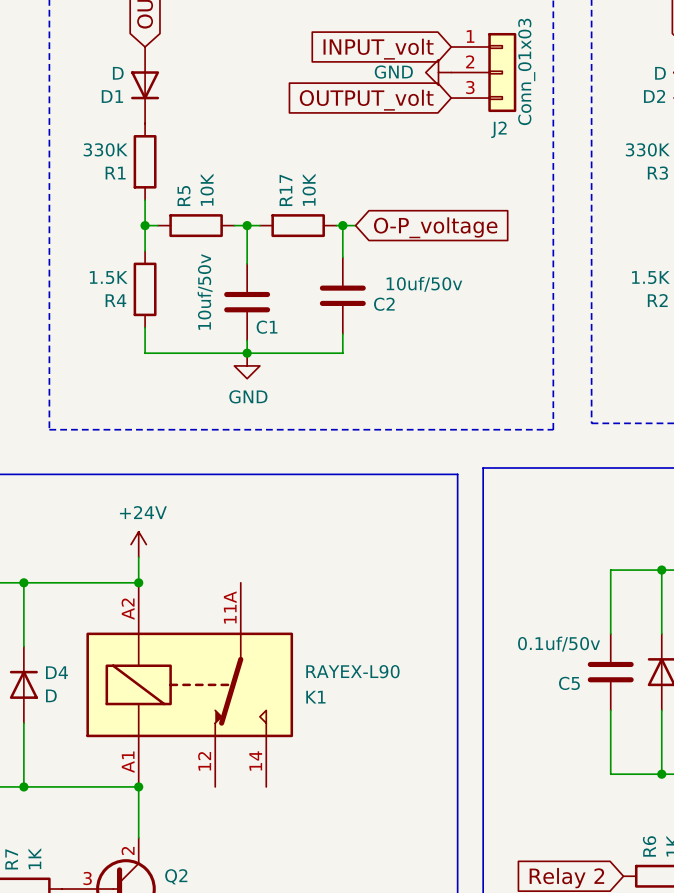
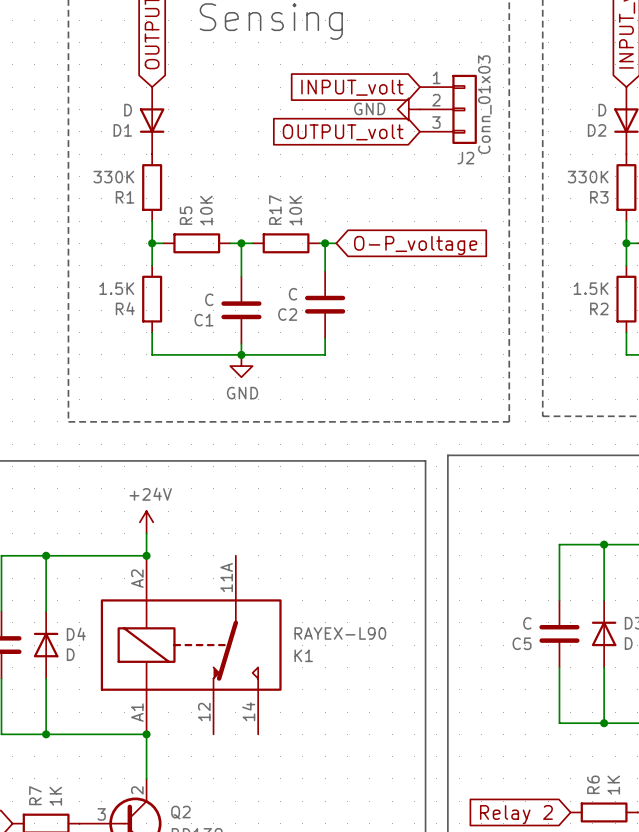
C2 value: 10uf/50v (424, 284) -> C (292, 294)
C1 value: 10uf/50v (205, 291) -> C (209, 299)
C2 name position: C2 (384, 304) -> C2 (287, 314)
C1 name position: C1 (267, 327) -> C1 (203, 320)
C5 value: 0.1uf/50v (559, 644) -> C (527, 623)

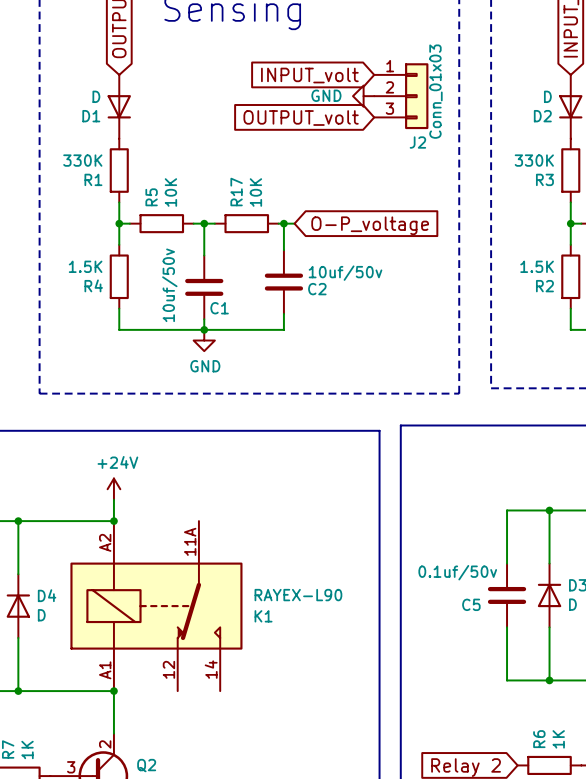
C2 value: C (292, 294) -> 10uf/50v (345, 273)
C1 value: C (209, 299) -> 10uf/50v (169, 285)
C2 name position: C2 (287, 314) -> C2 (317, 289)
C1 name position: C1 (203, 320) -> C1 (219, 308)
C5 value: C (527, 623) -> 0.1uf/50v (457, 572)

